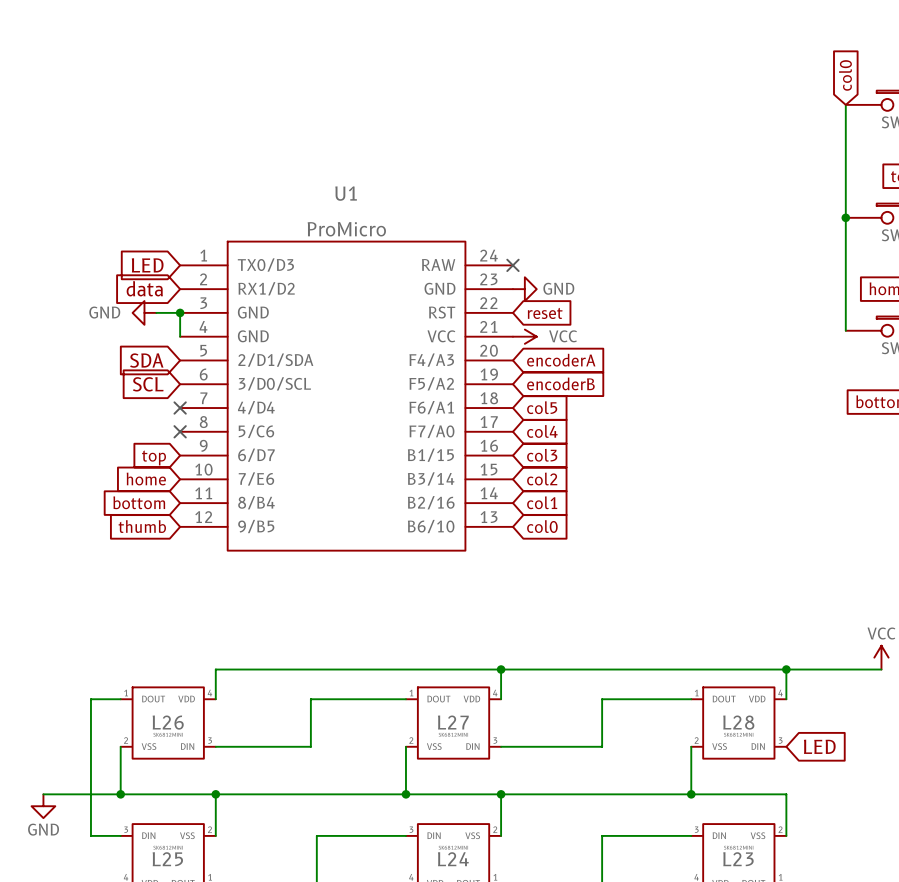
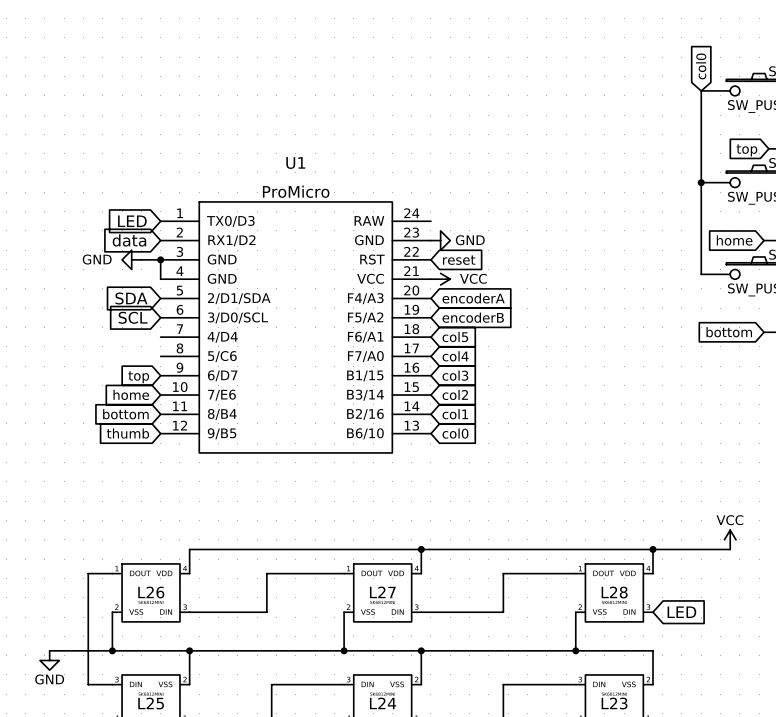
no-connect mark: (512, 265) -> none
no-connect mark: (180, 408) -> none
no-connect mark: (180, 431) -> none

